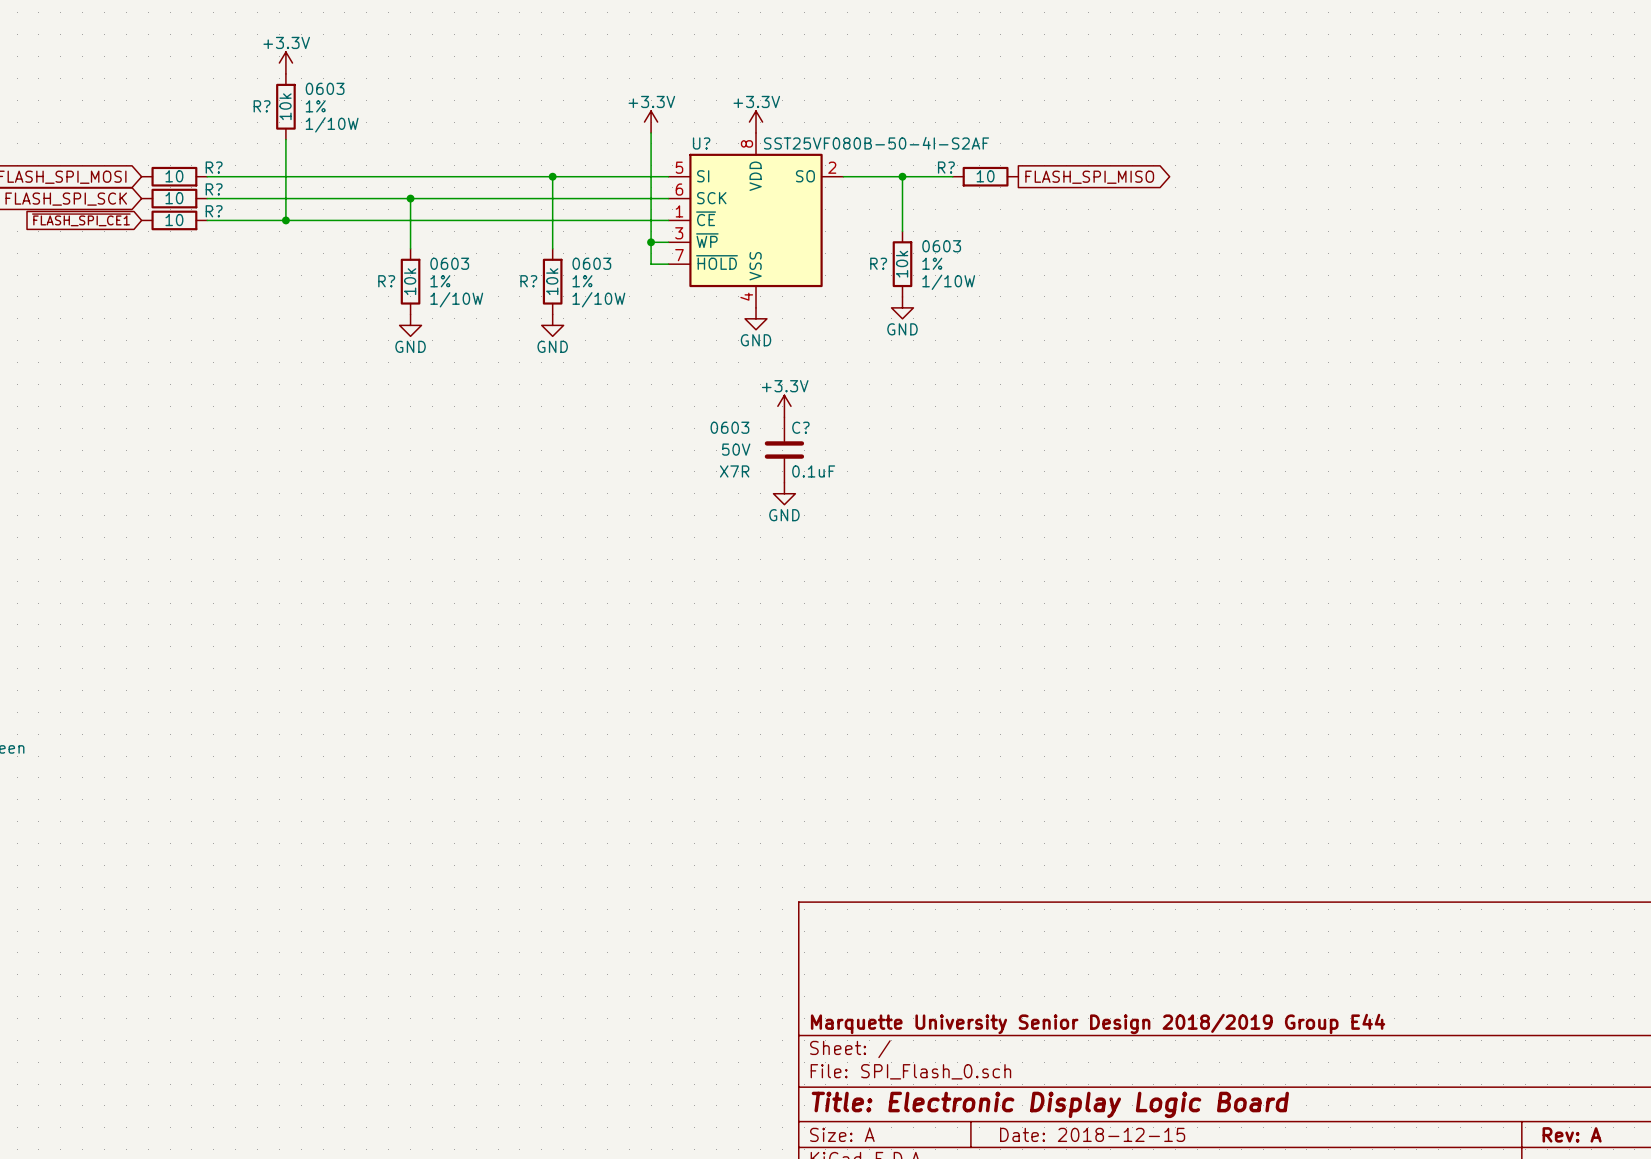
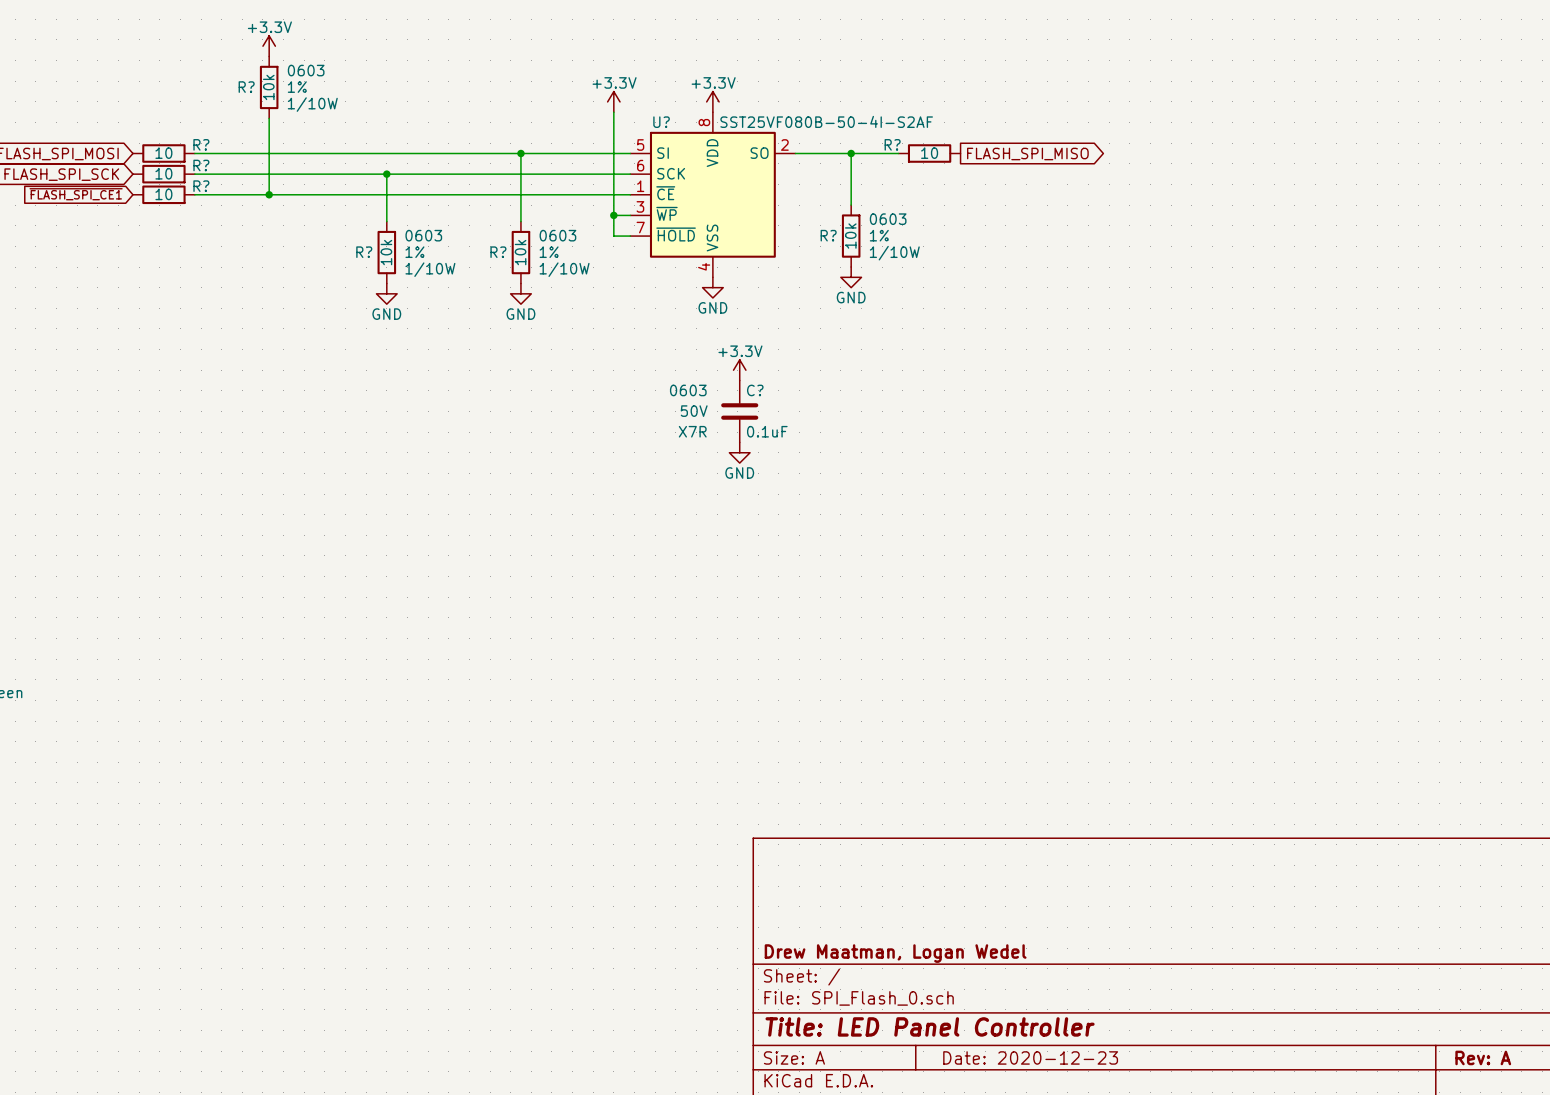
title block: Marquette University Senior Design 2018/2019 Group E44 (1098, 1023) -> Drew Maatman, Logan Wedel (895, 953)
title block: Title: Electronic Display Logic Board (1050, 1104) -> Title: LED Panel Controller (930, 1026)
title block: Date: 2018-12-15 (1092, 1134) -> Date: 2020-12-23 (1030, 1057)

